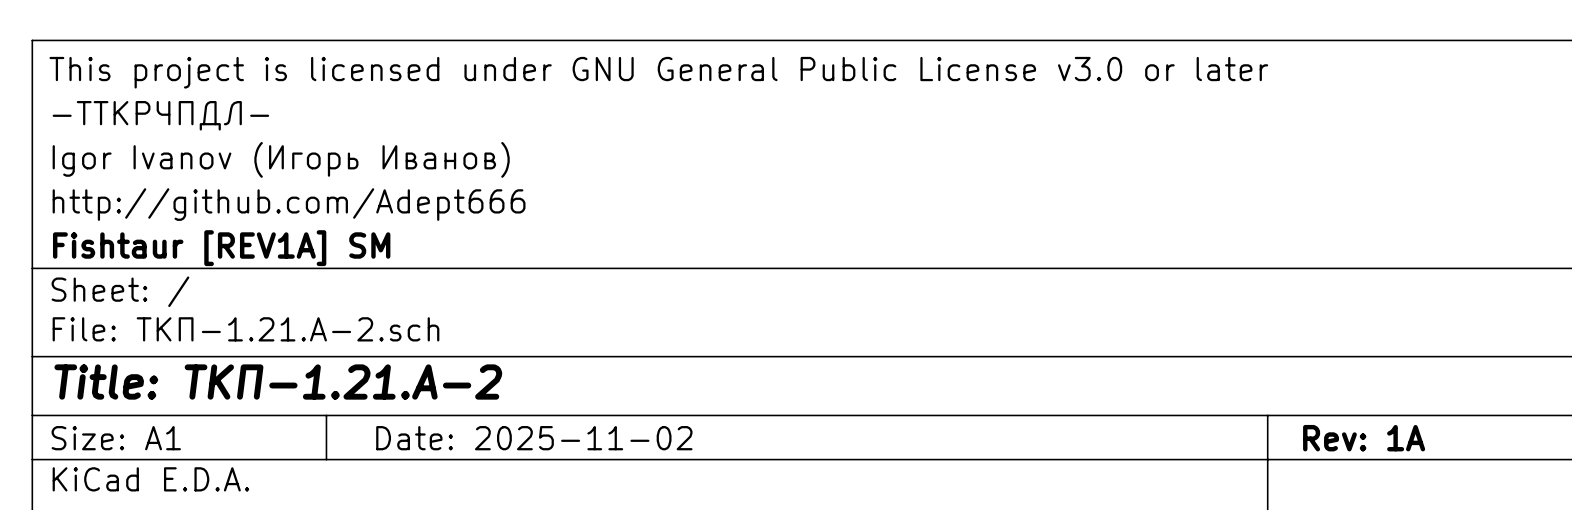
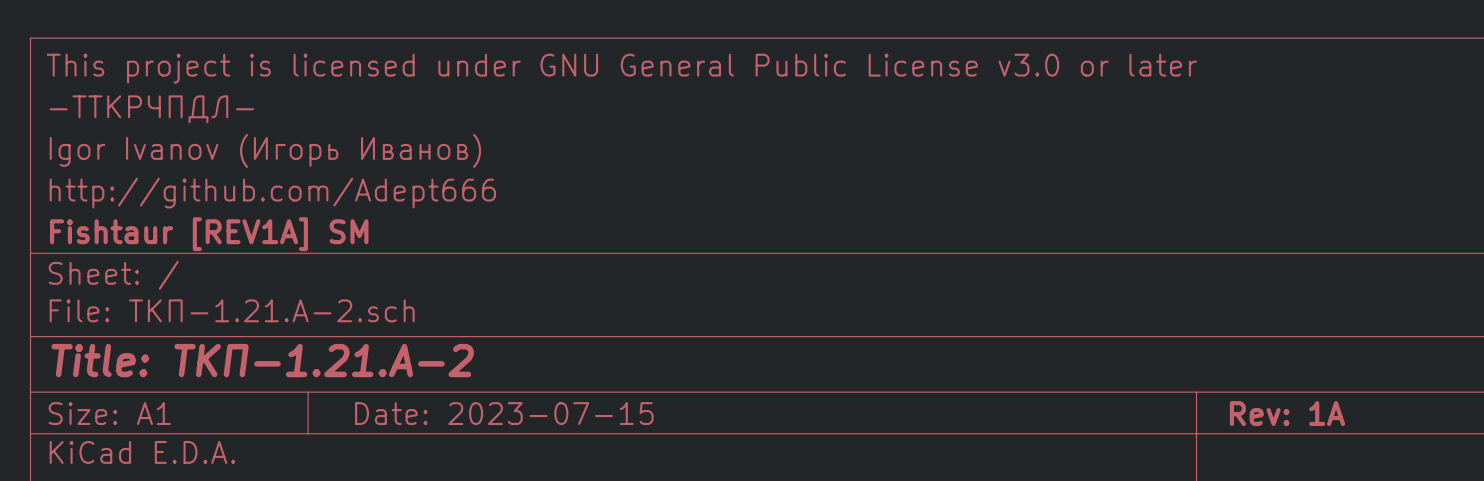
title block: Date: 2025-11-02 (534, 438) -> Date: 2023-07-15 (504, 413)

